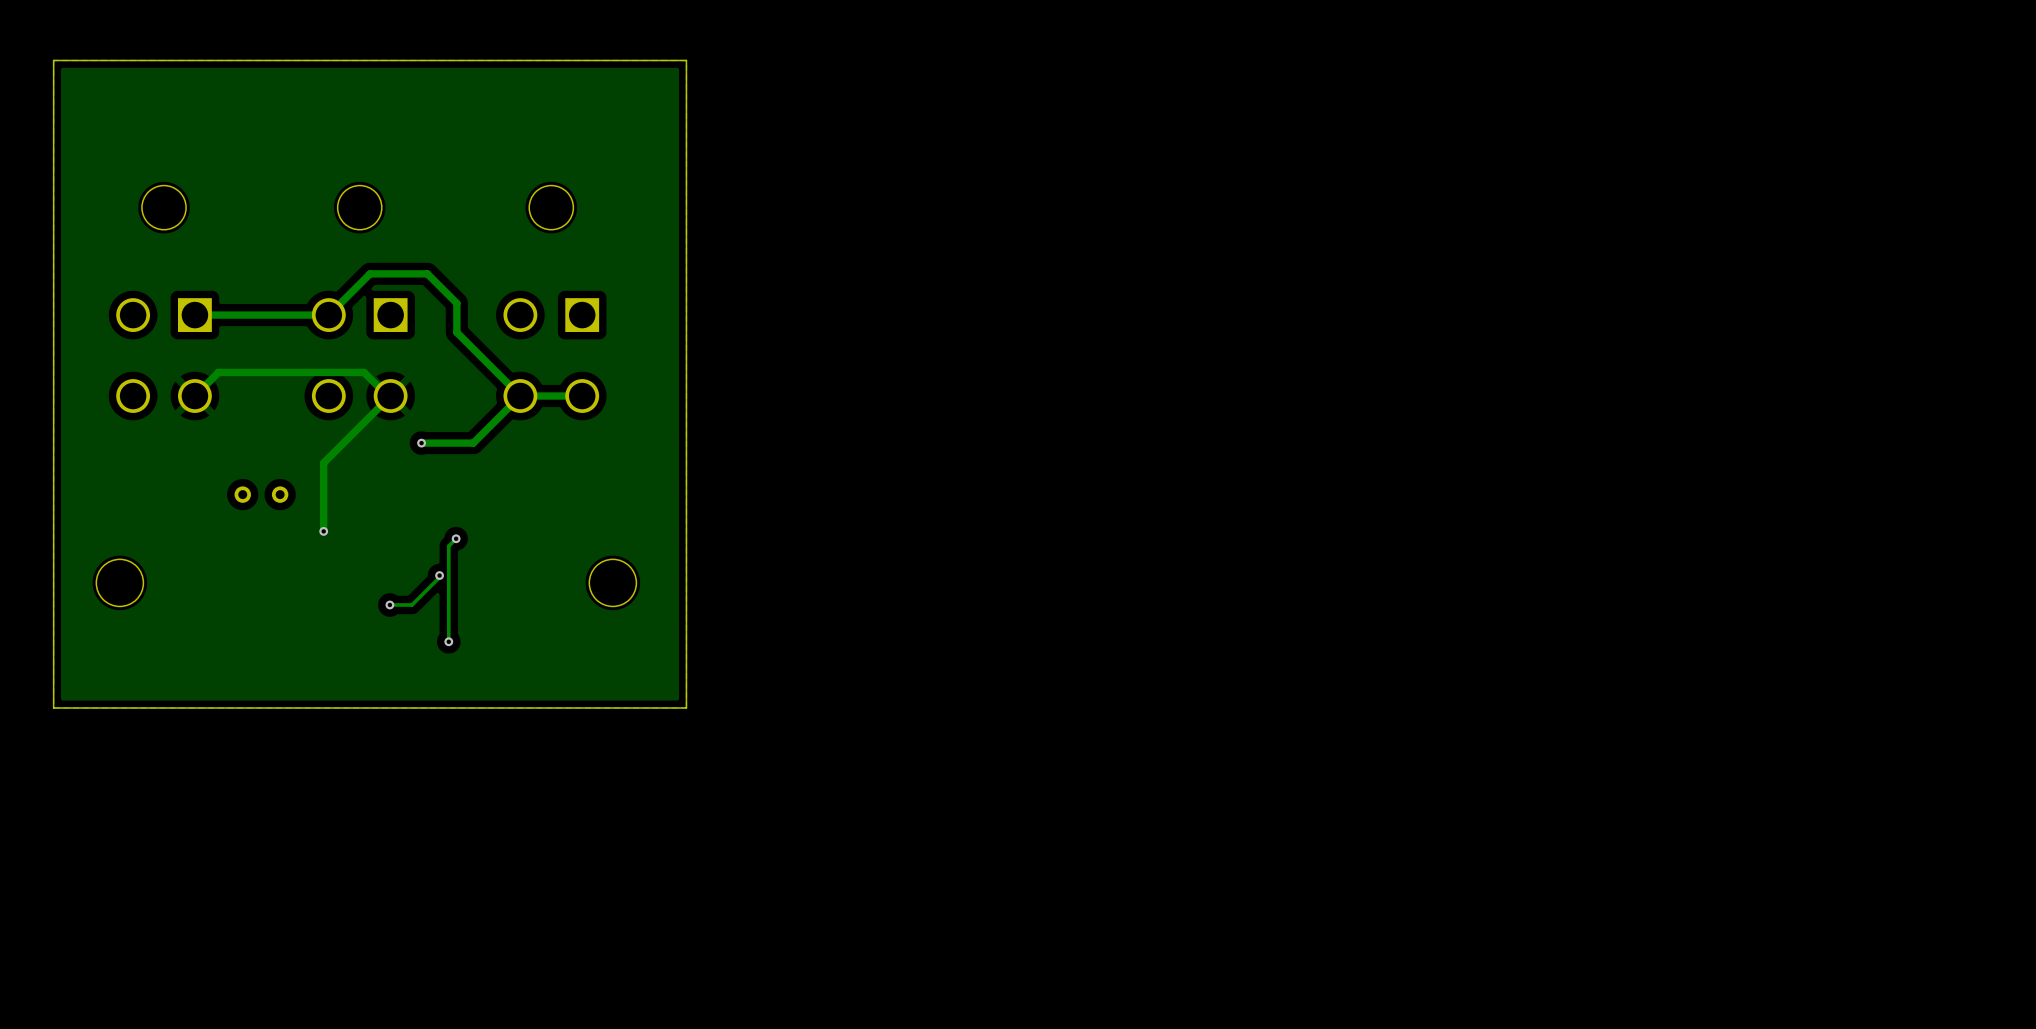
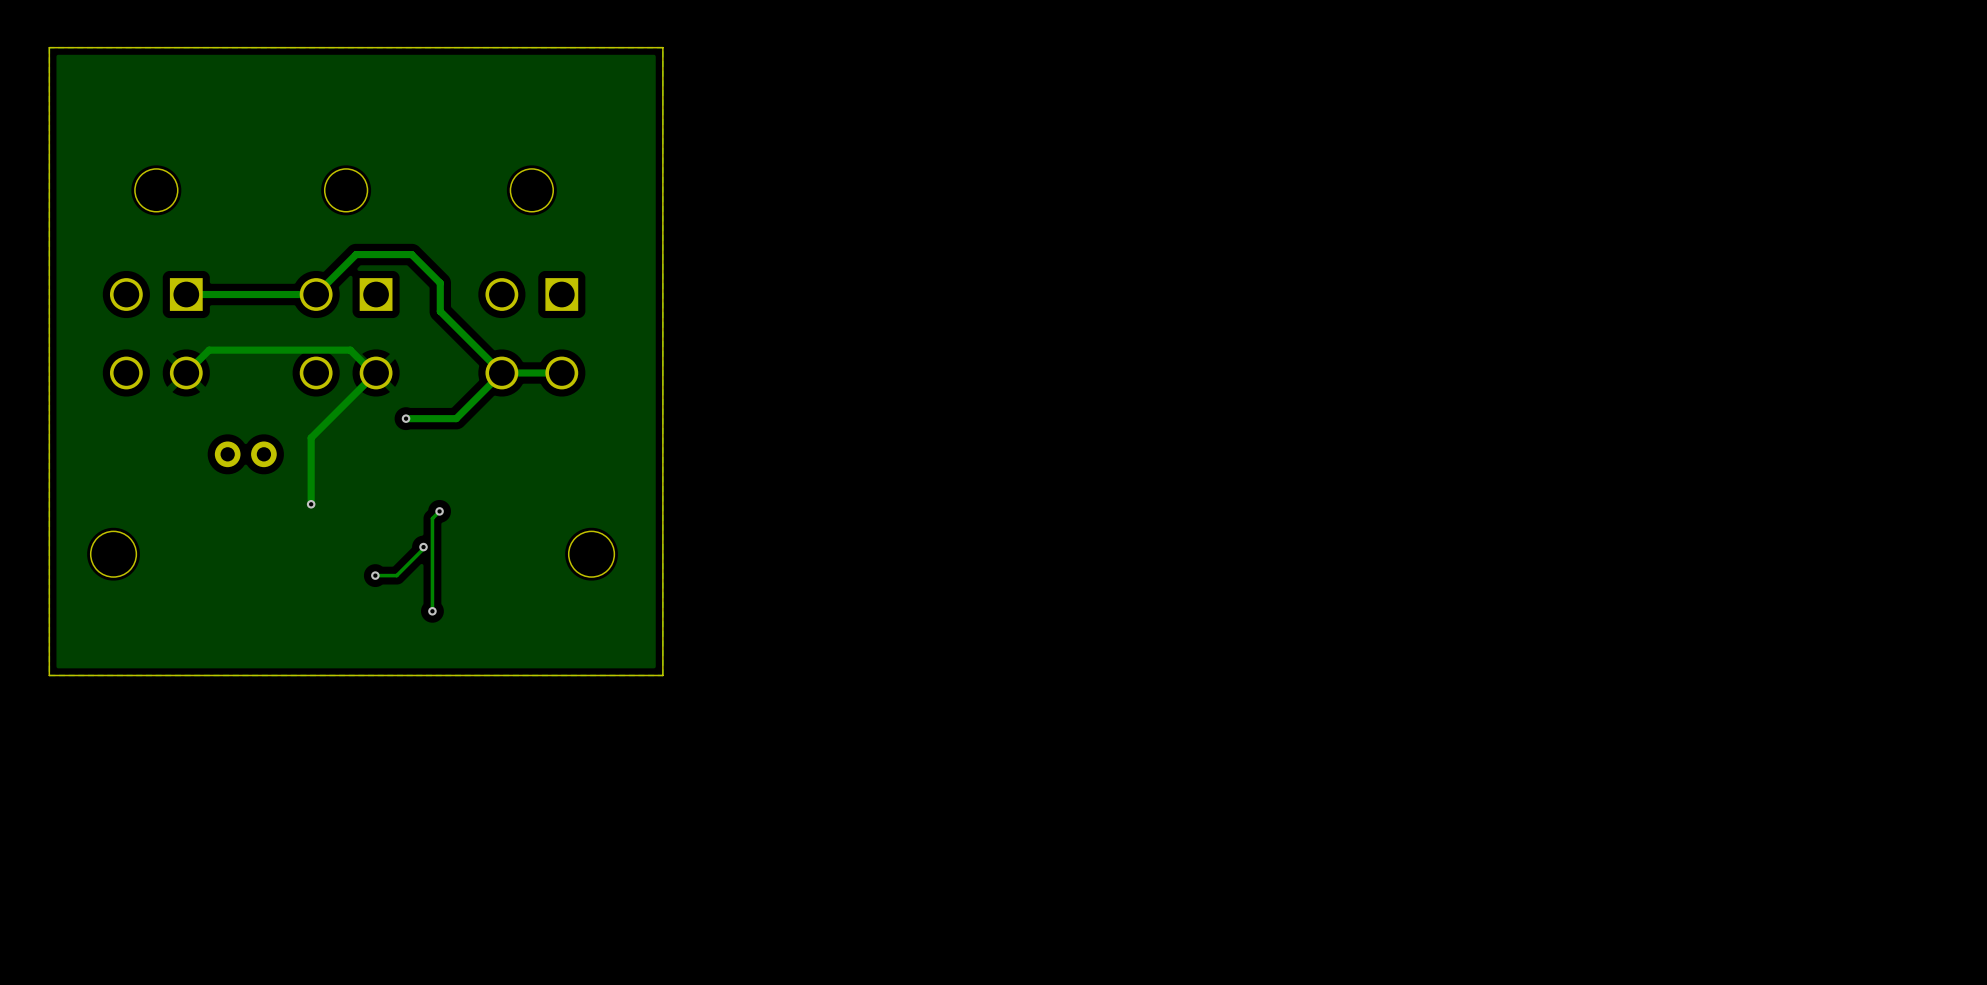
part: none -> (245, 454)
part: (261, 494) -> none

